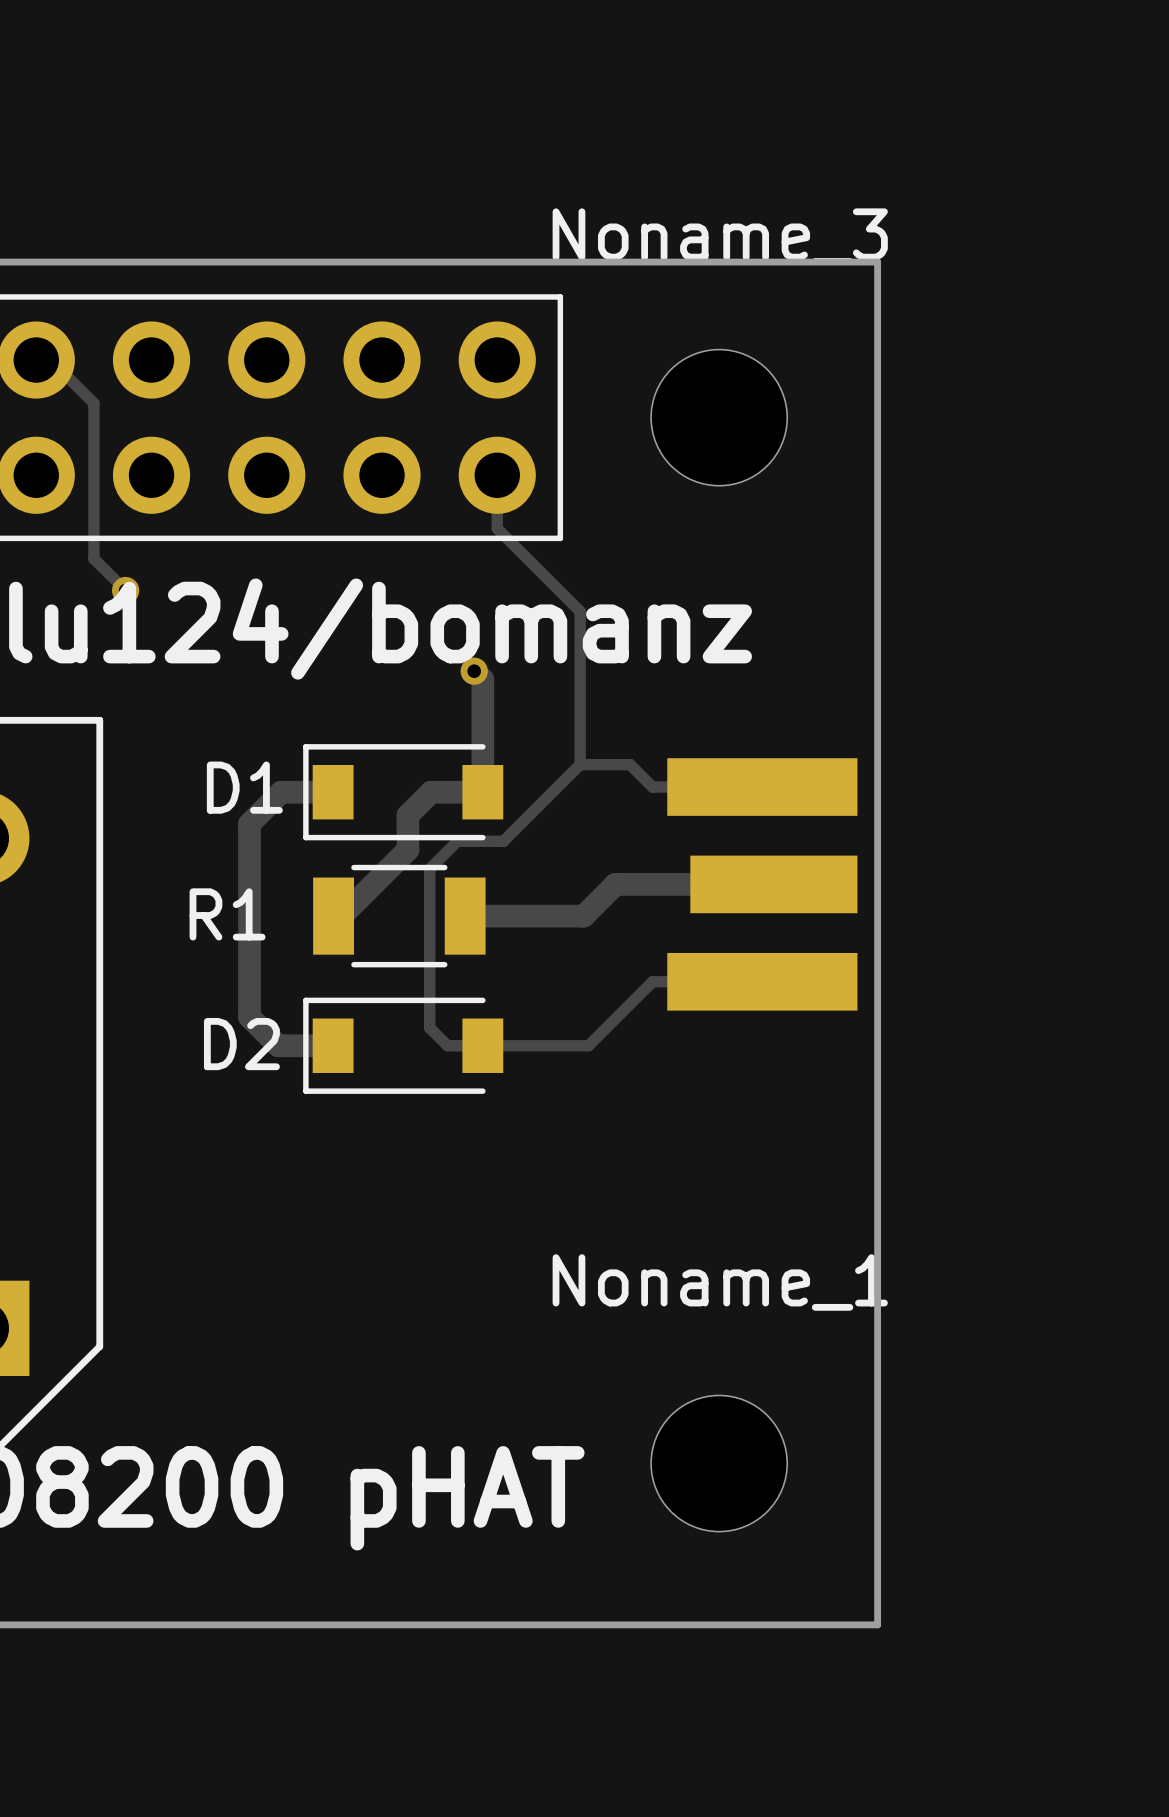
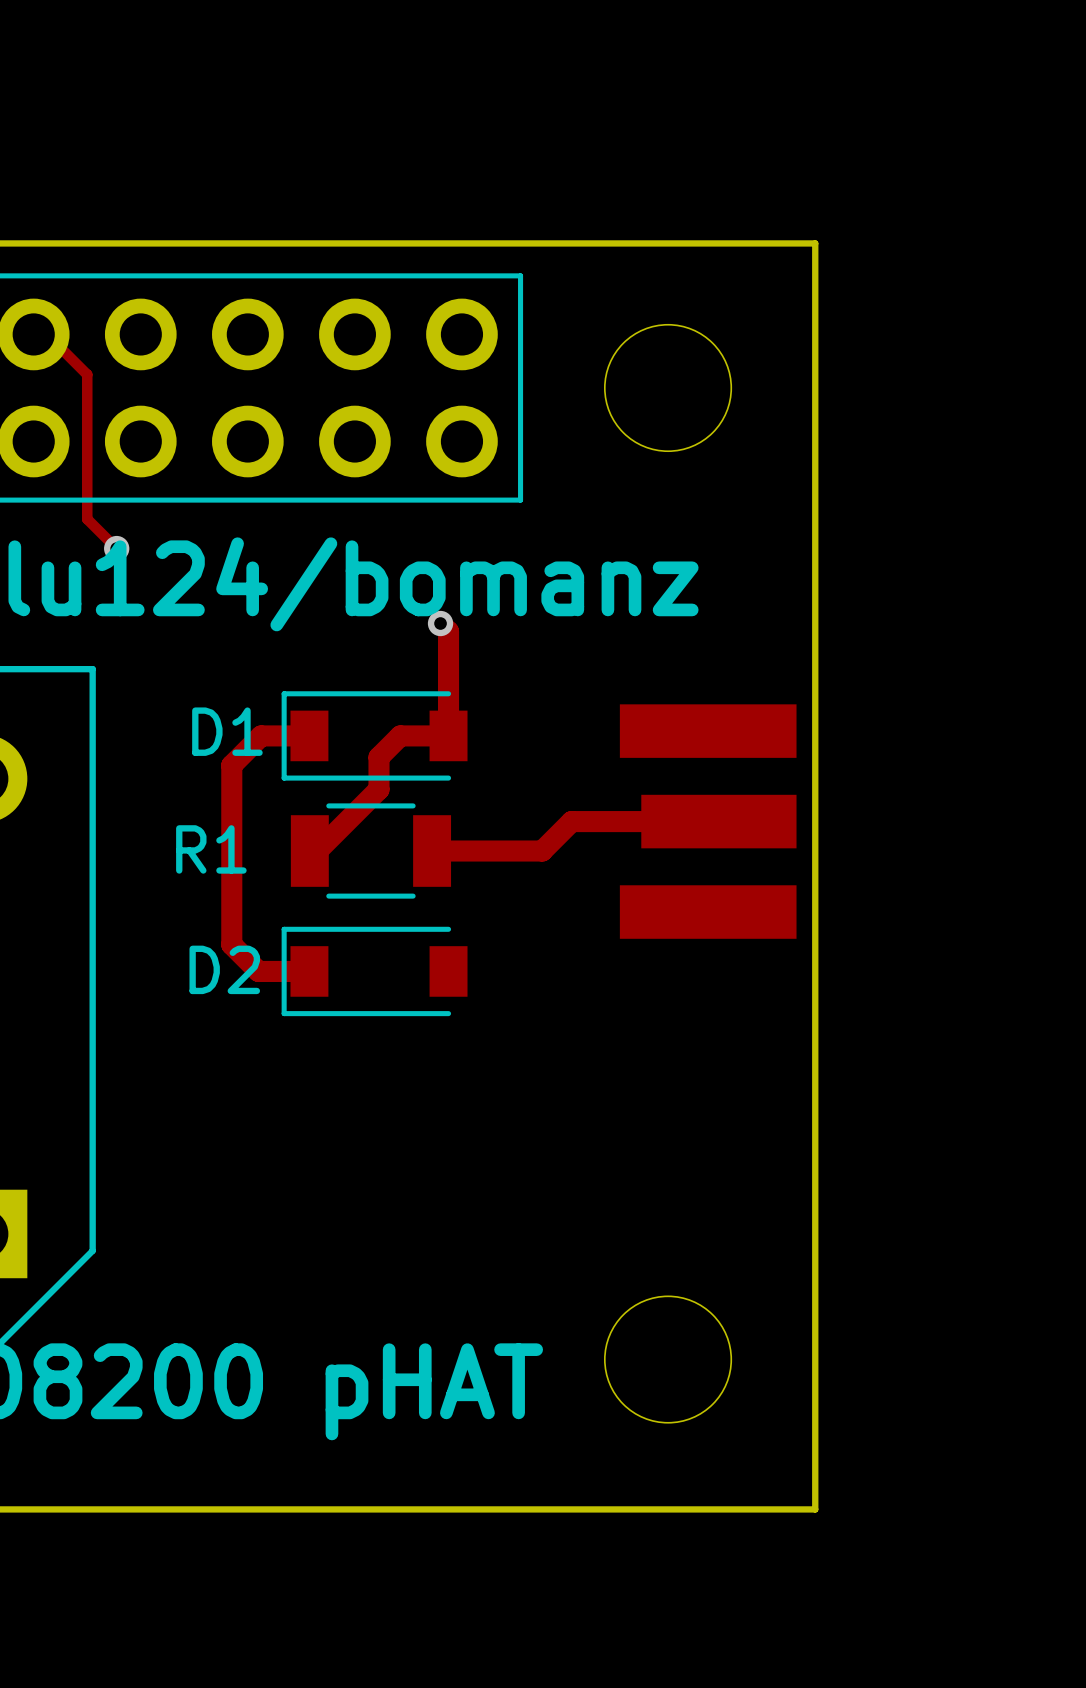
Noname_3 name: Noname_3 (720, 236) -> none
track: (497, 475) (497, 528) (580, 611) (580, 764) -> none
track: (580, 764) (503, 841) (457, 841) (429, 869) (429, 1027) (447, 1045) (588, 1045) (652, 981) (762, 981) -> none
track: (580, 764) (630, 764) (652, 787) (762, 787) -> none
Noname_1 name: Noname_1 (720, 1282) -> none

